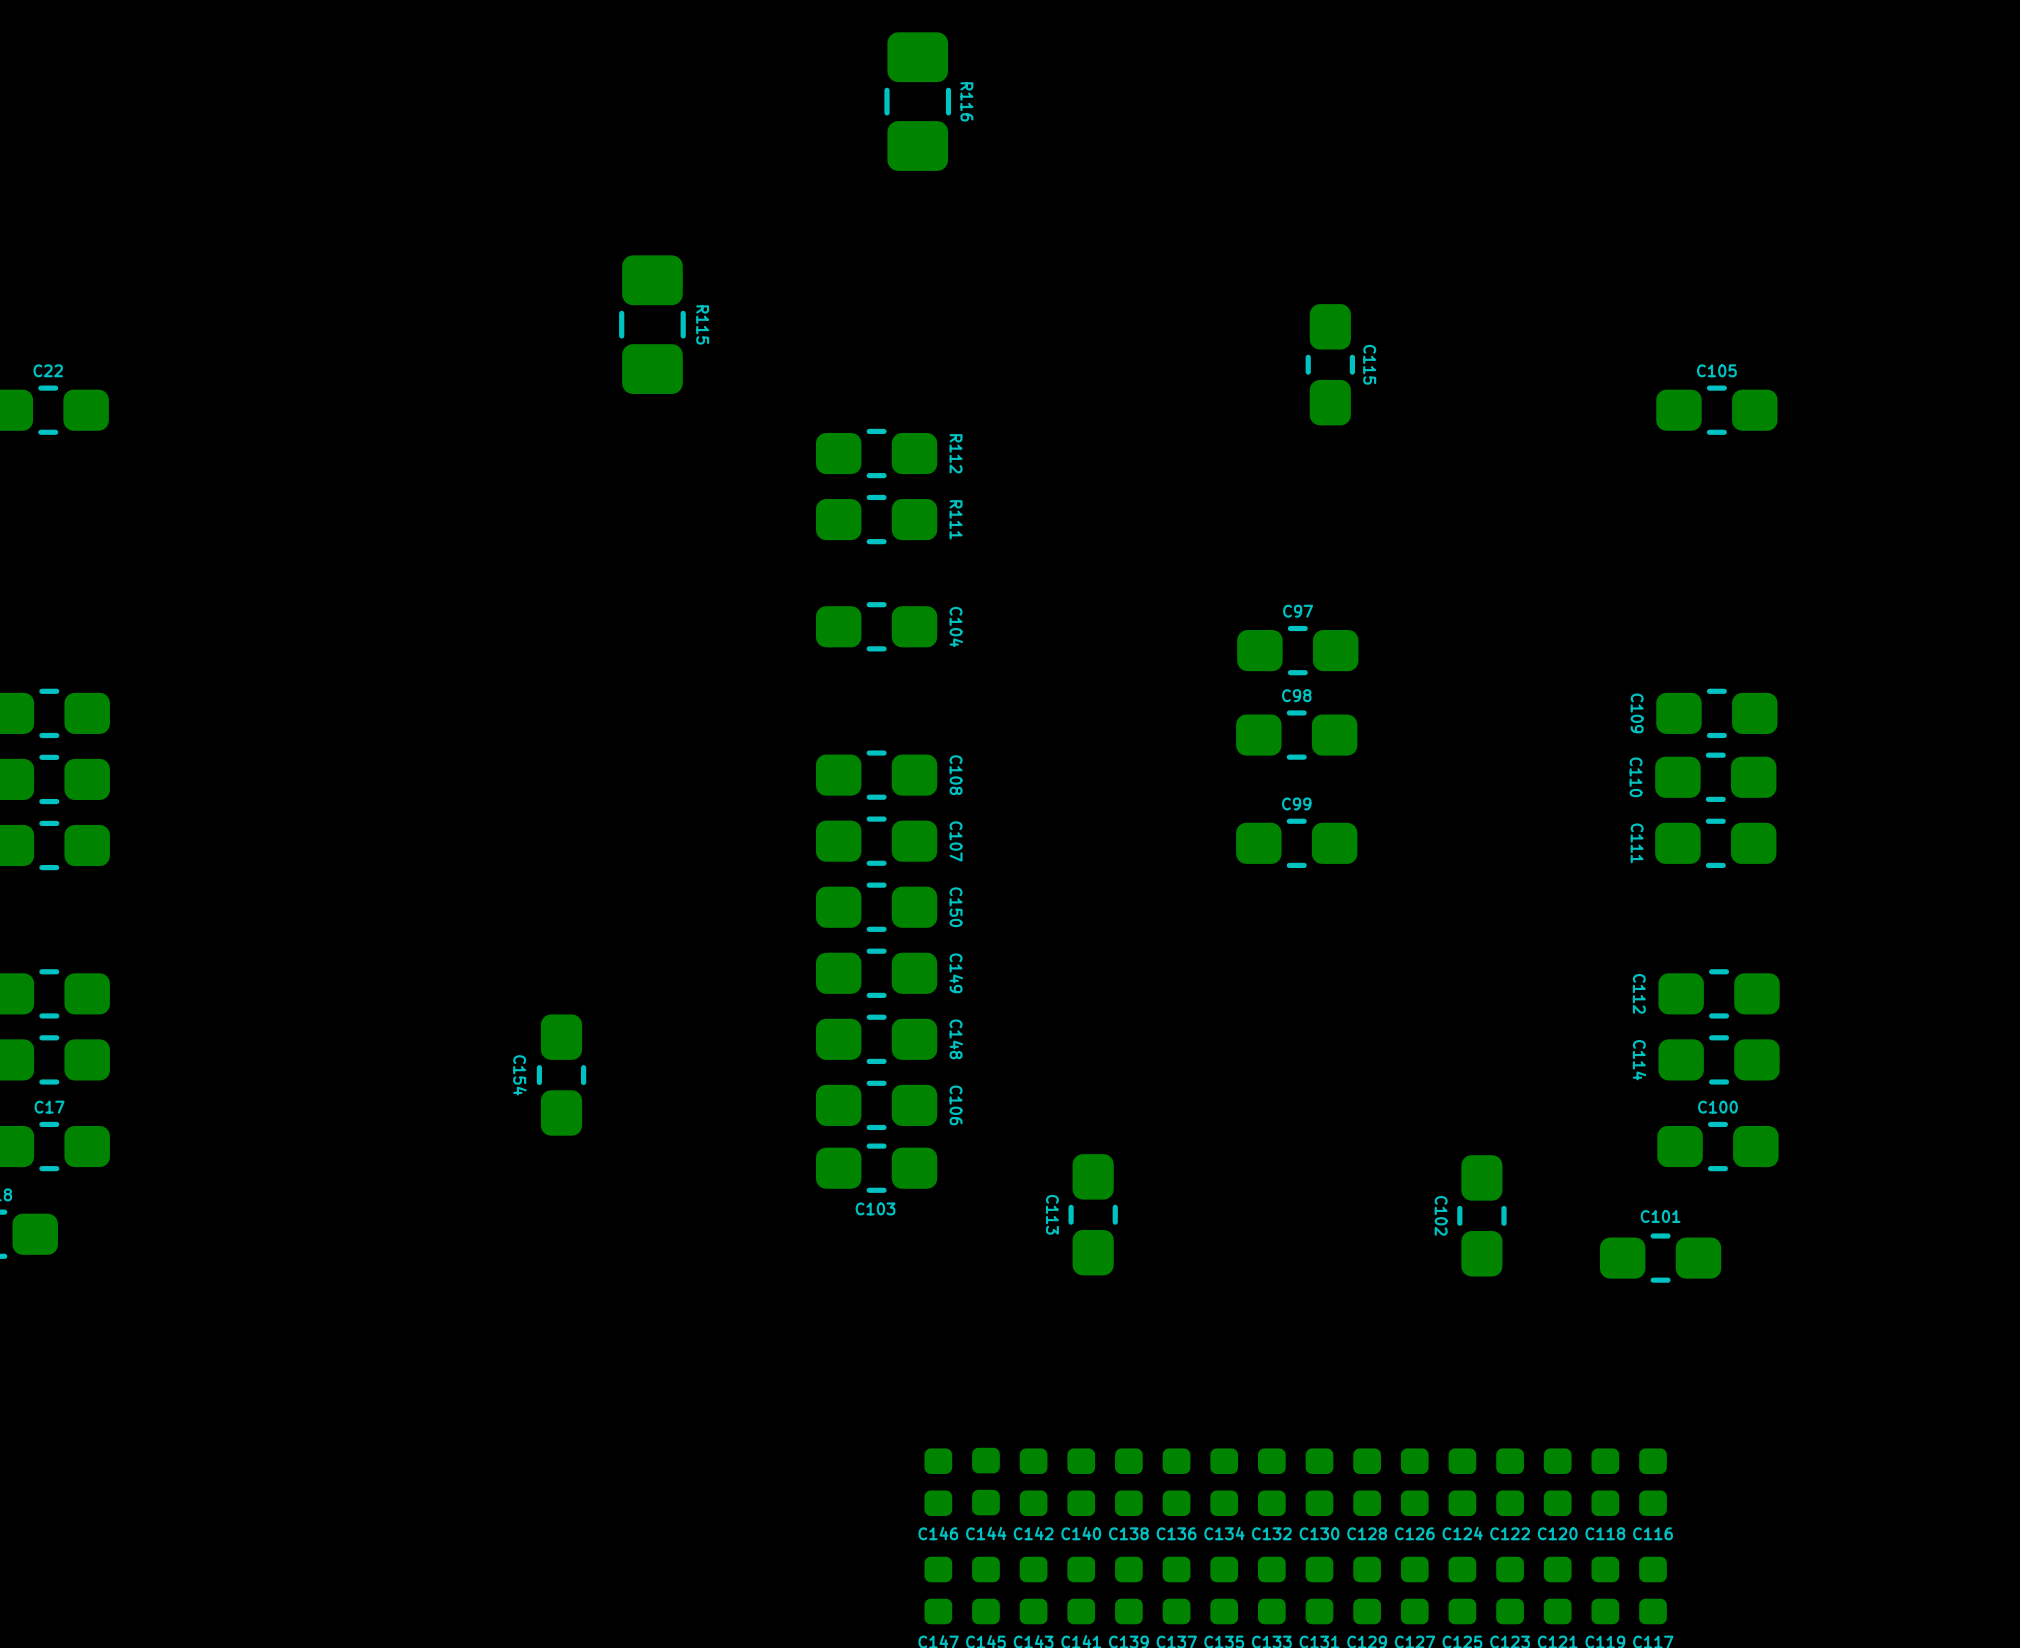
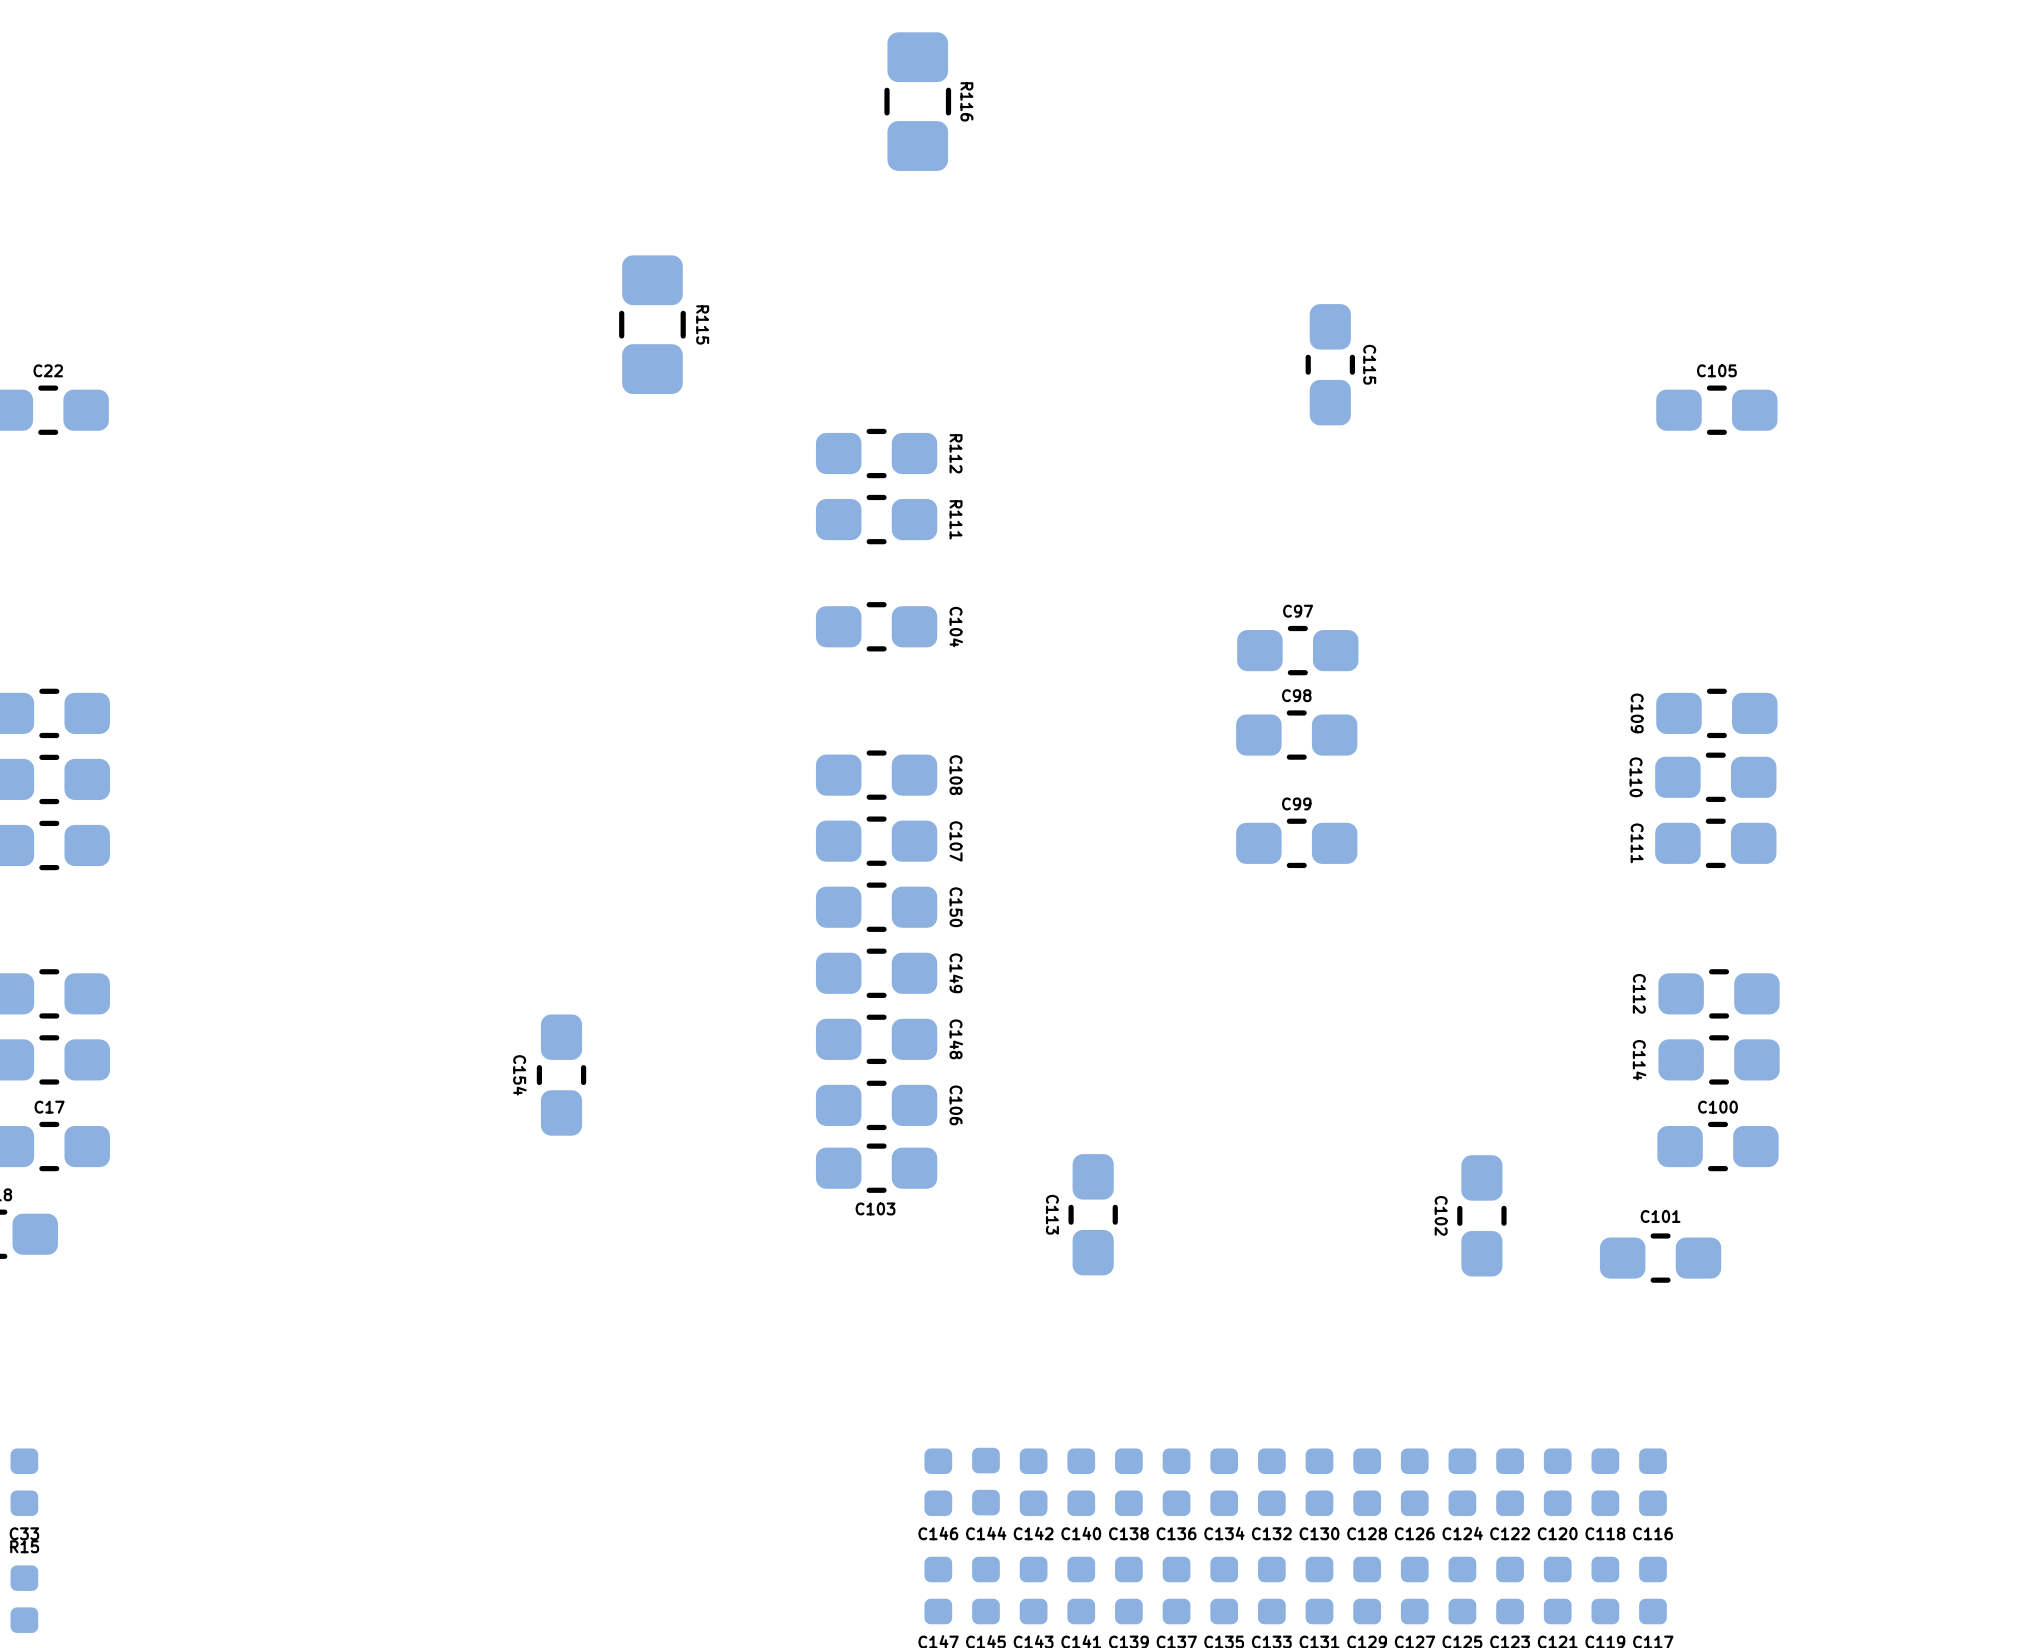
C33: none -> (24, 1482)
R15: none -> (24, 1599)

